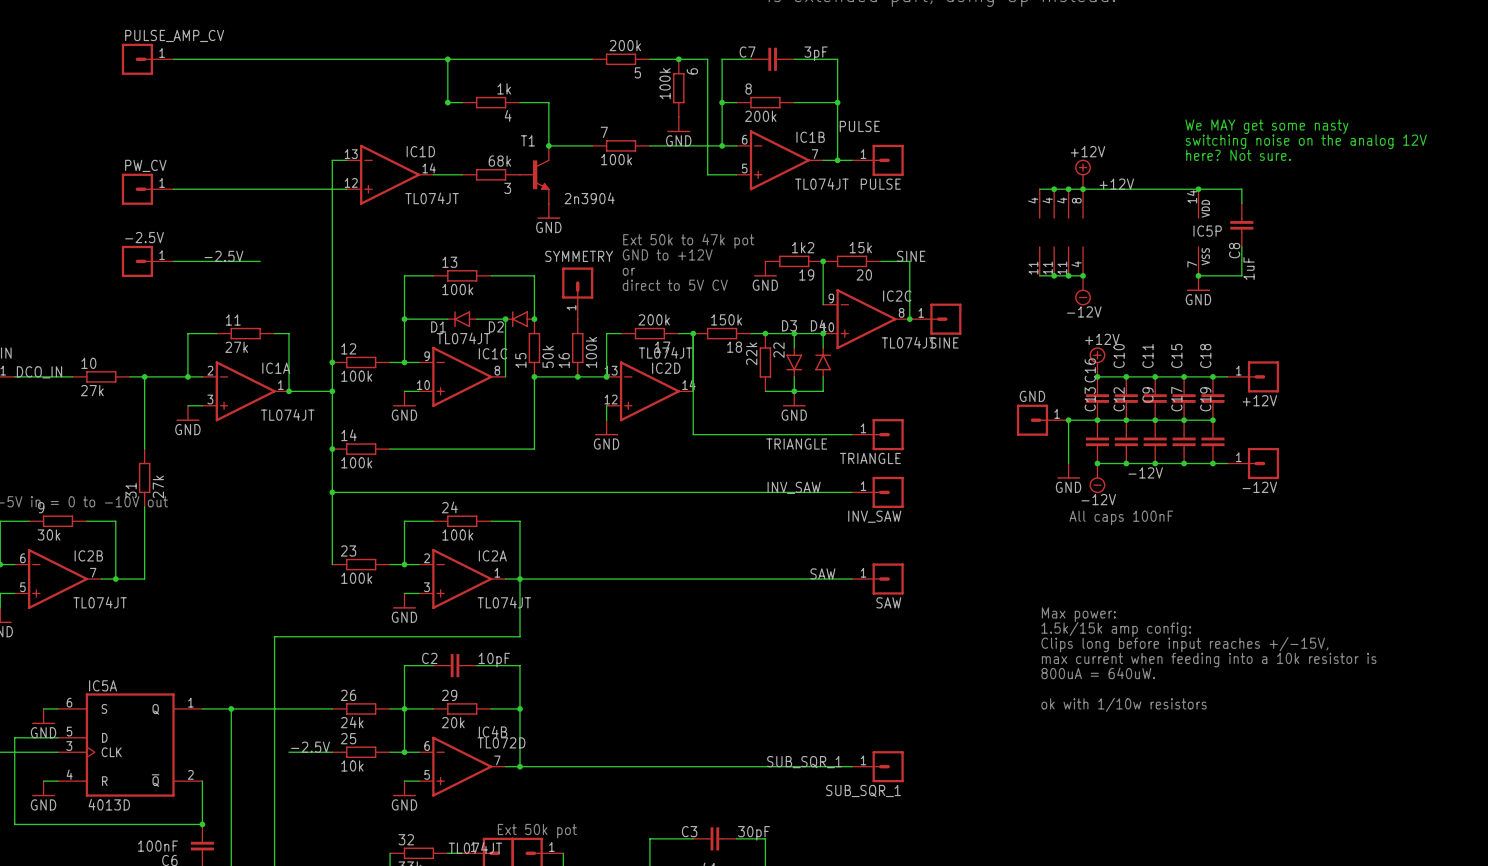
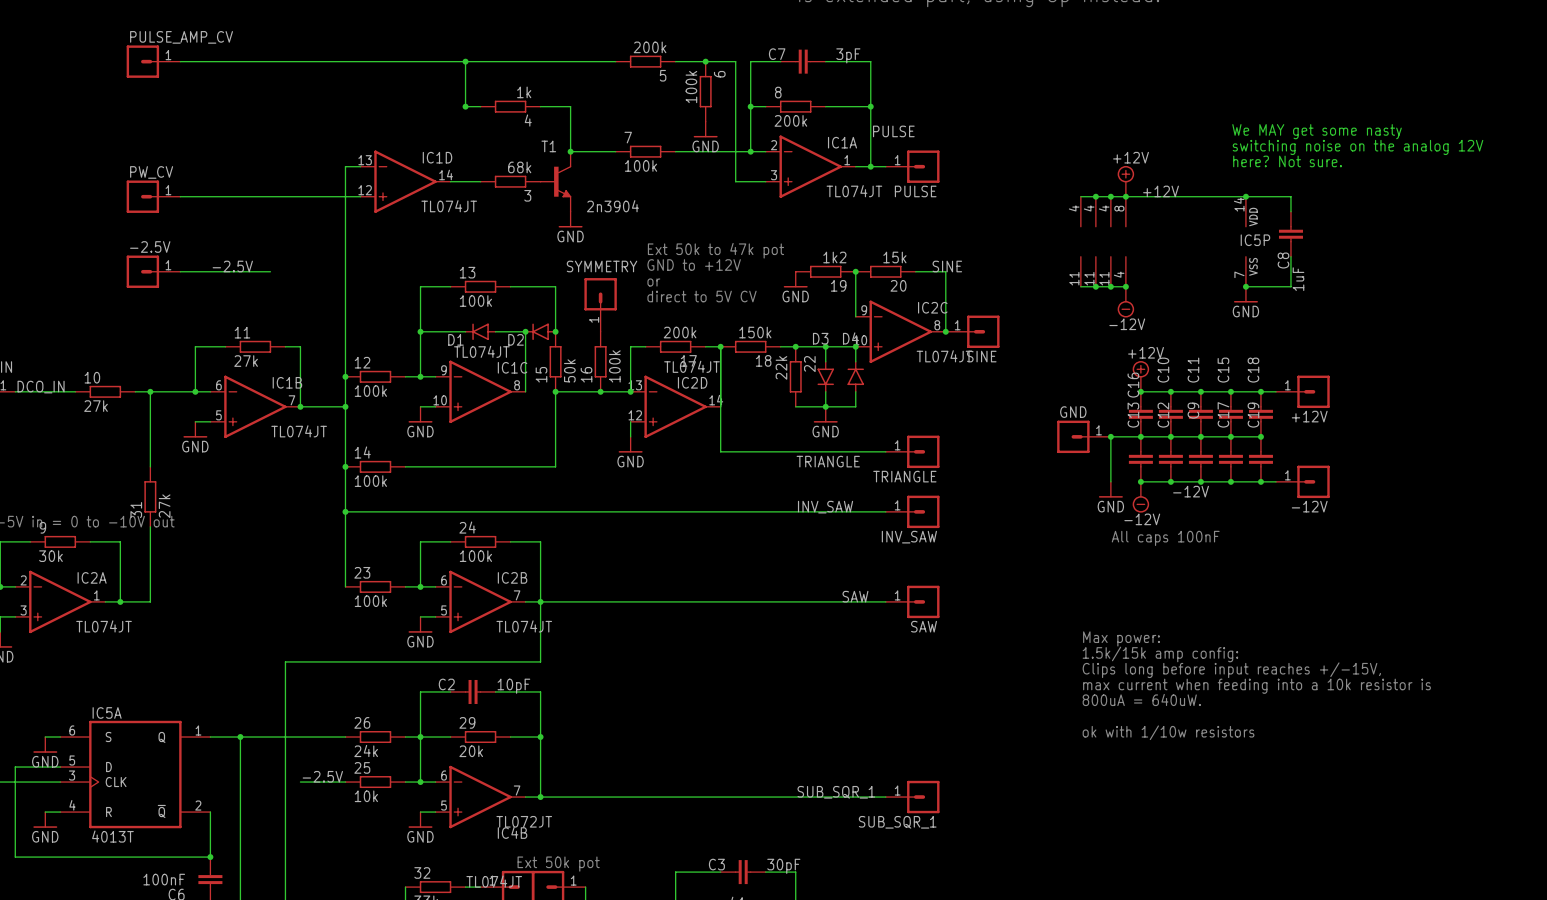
IC1B position: (779, 160) -> (255, 406)
IC1A position: (245, 391) -> (810, 166)
IC2B position: (58, 579) -> (480, 601)
IC2A position: (462, 579) -> (60, 601)
IC4B name position: IC4B (493, 731) -> IC4B (512, 832)
IC4B value: TL072D (501, 742) -> TL072JT (524, 821)
IC5A value: 4013D (109, 804) -> 4013T (112, 836)

